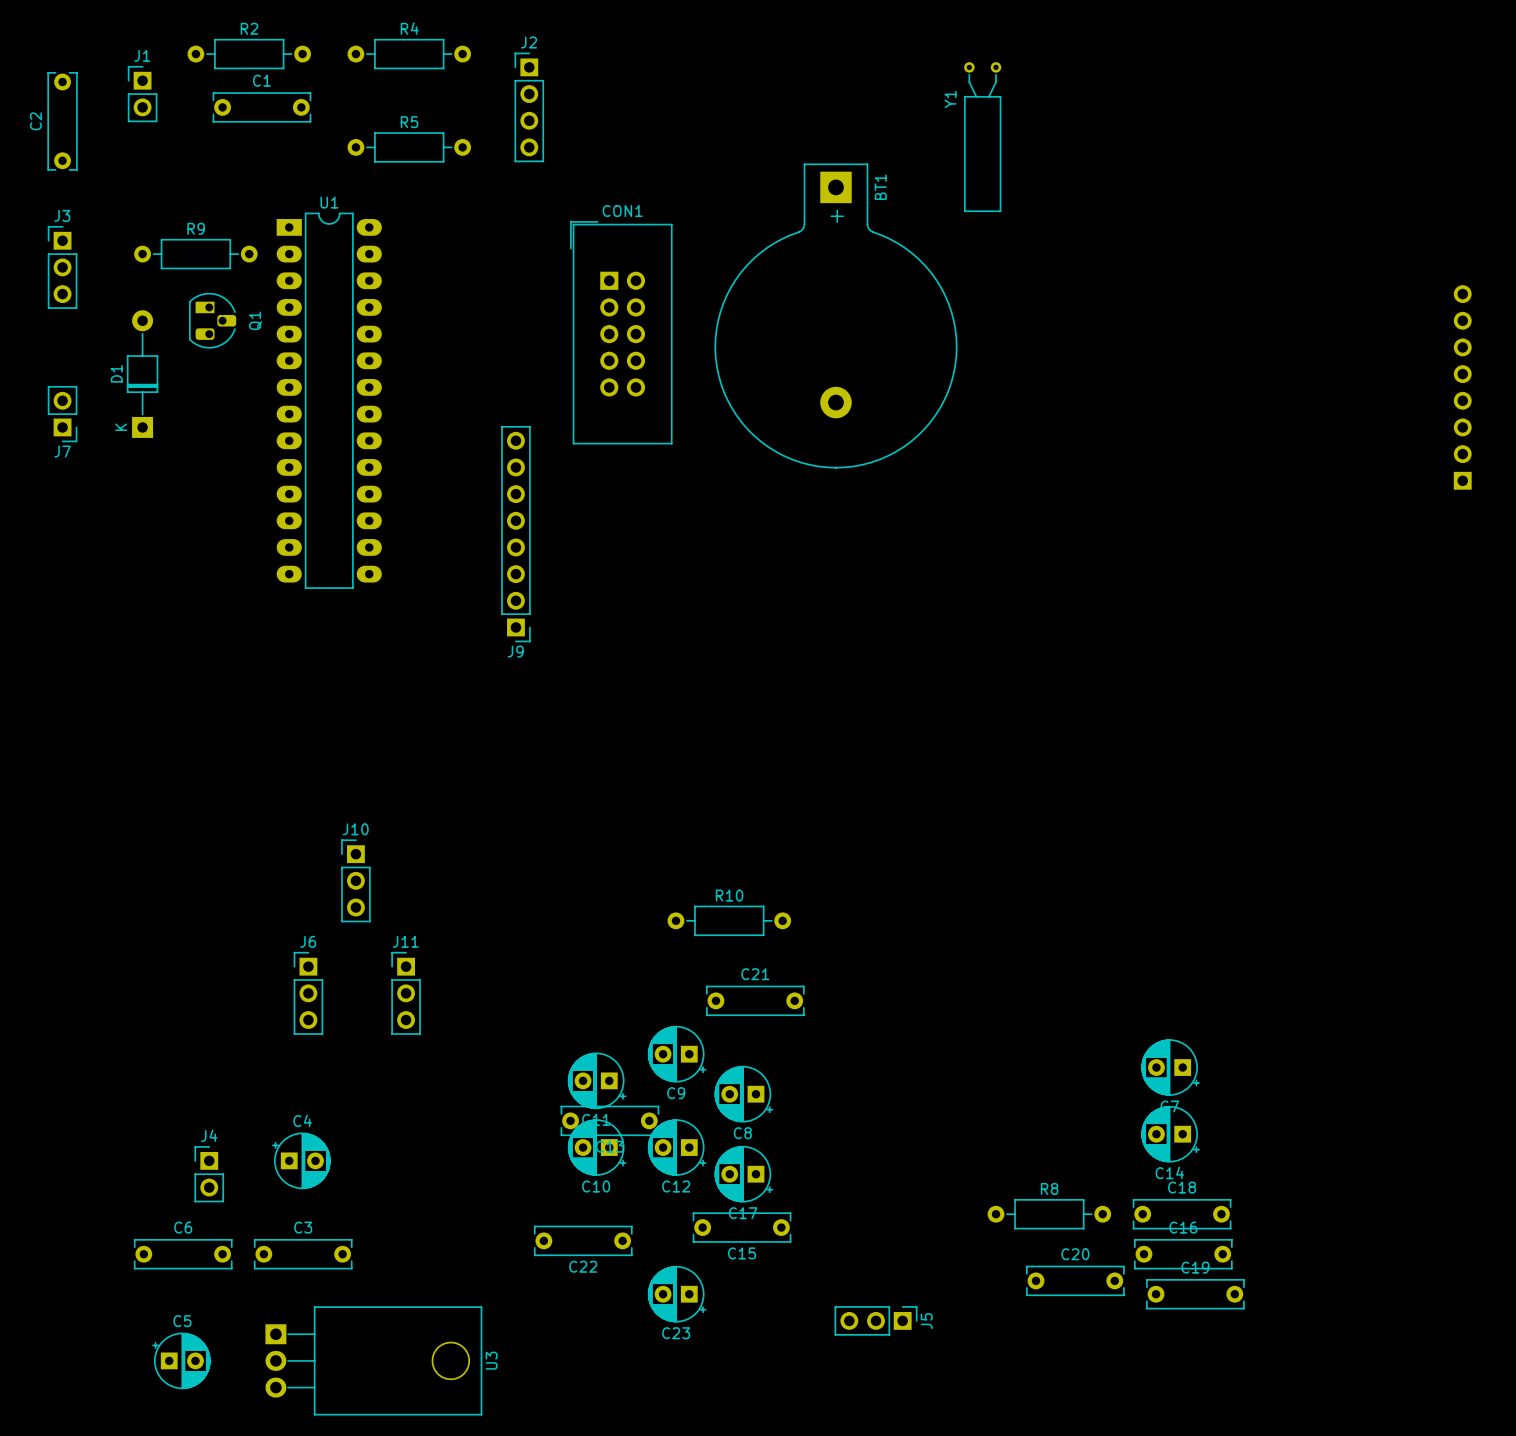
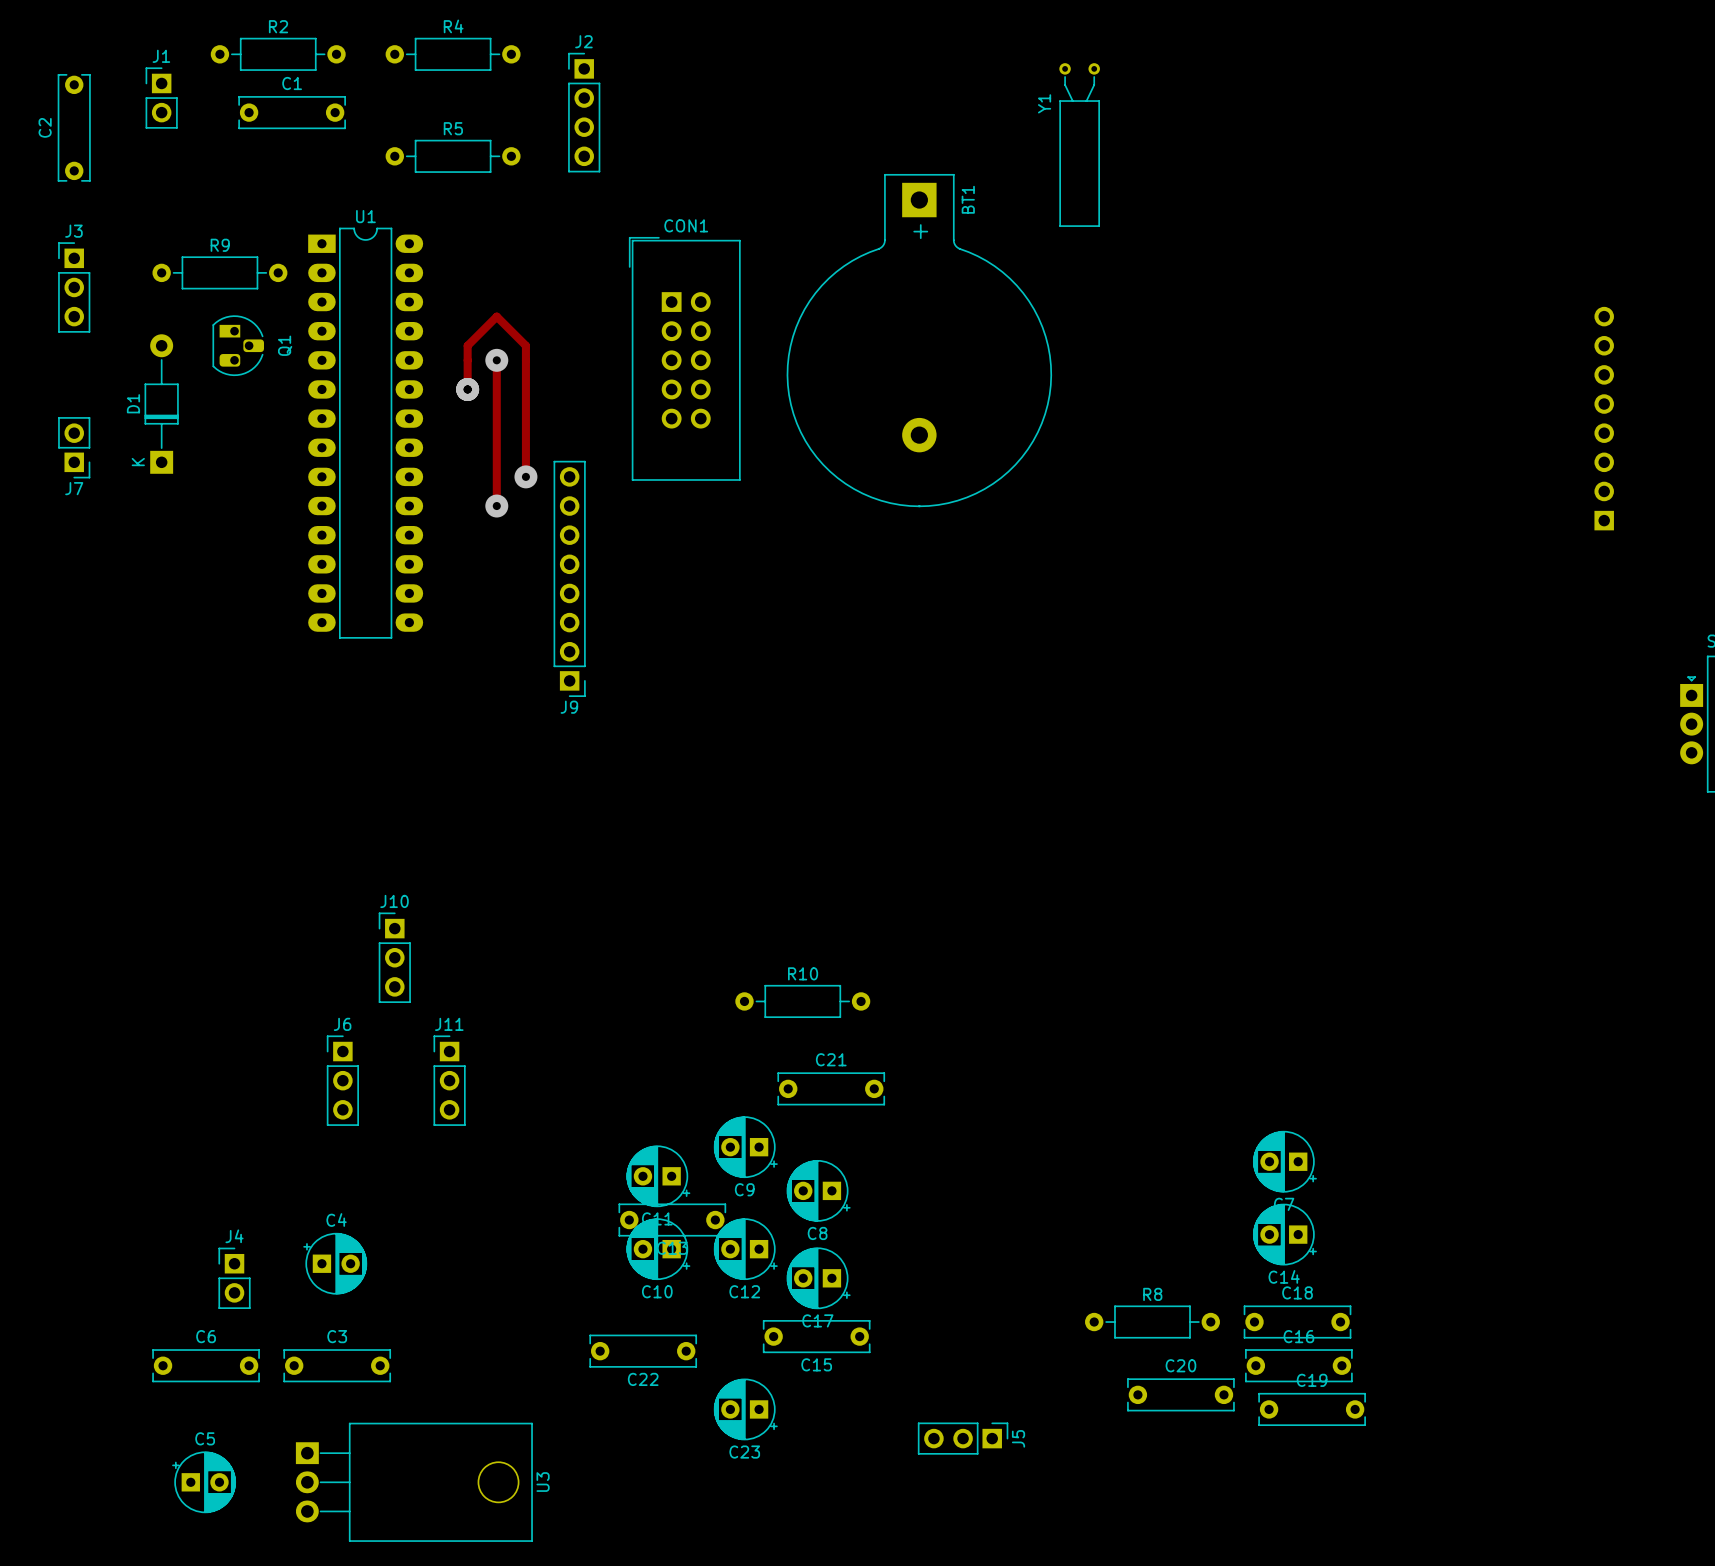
track: none -> (496, 360) (496, 506)
via: none -> (496, 360)
track: none -> (467, 389) (467, 345) (496, 316) (525, 345) (525, 476)
via: none -> (467, 389)
via: none -> (525, 476)
via: none -> (496, 506)

